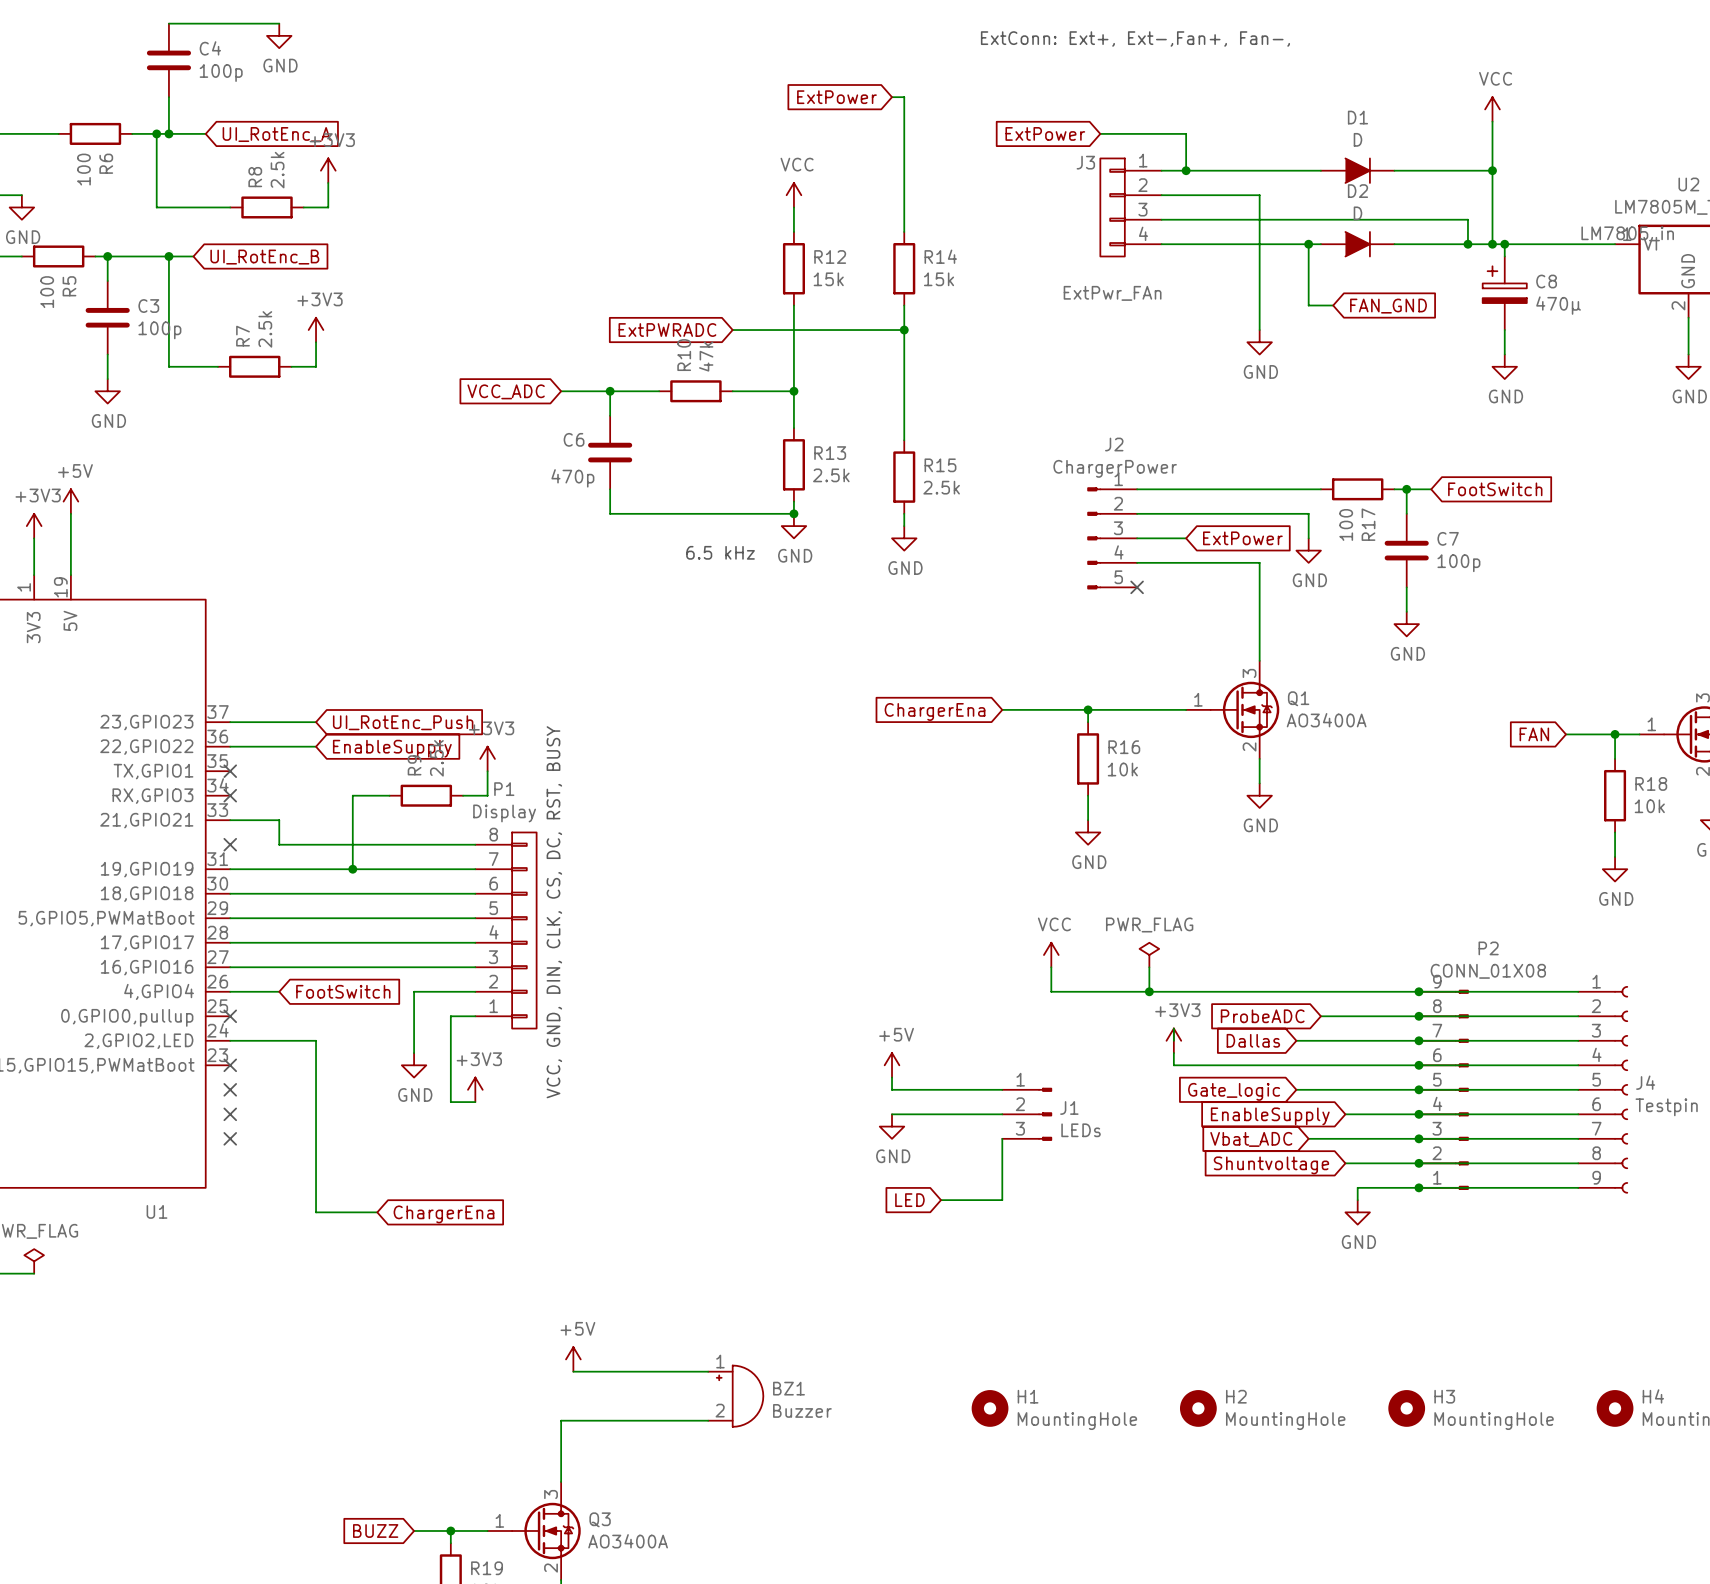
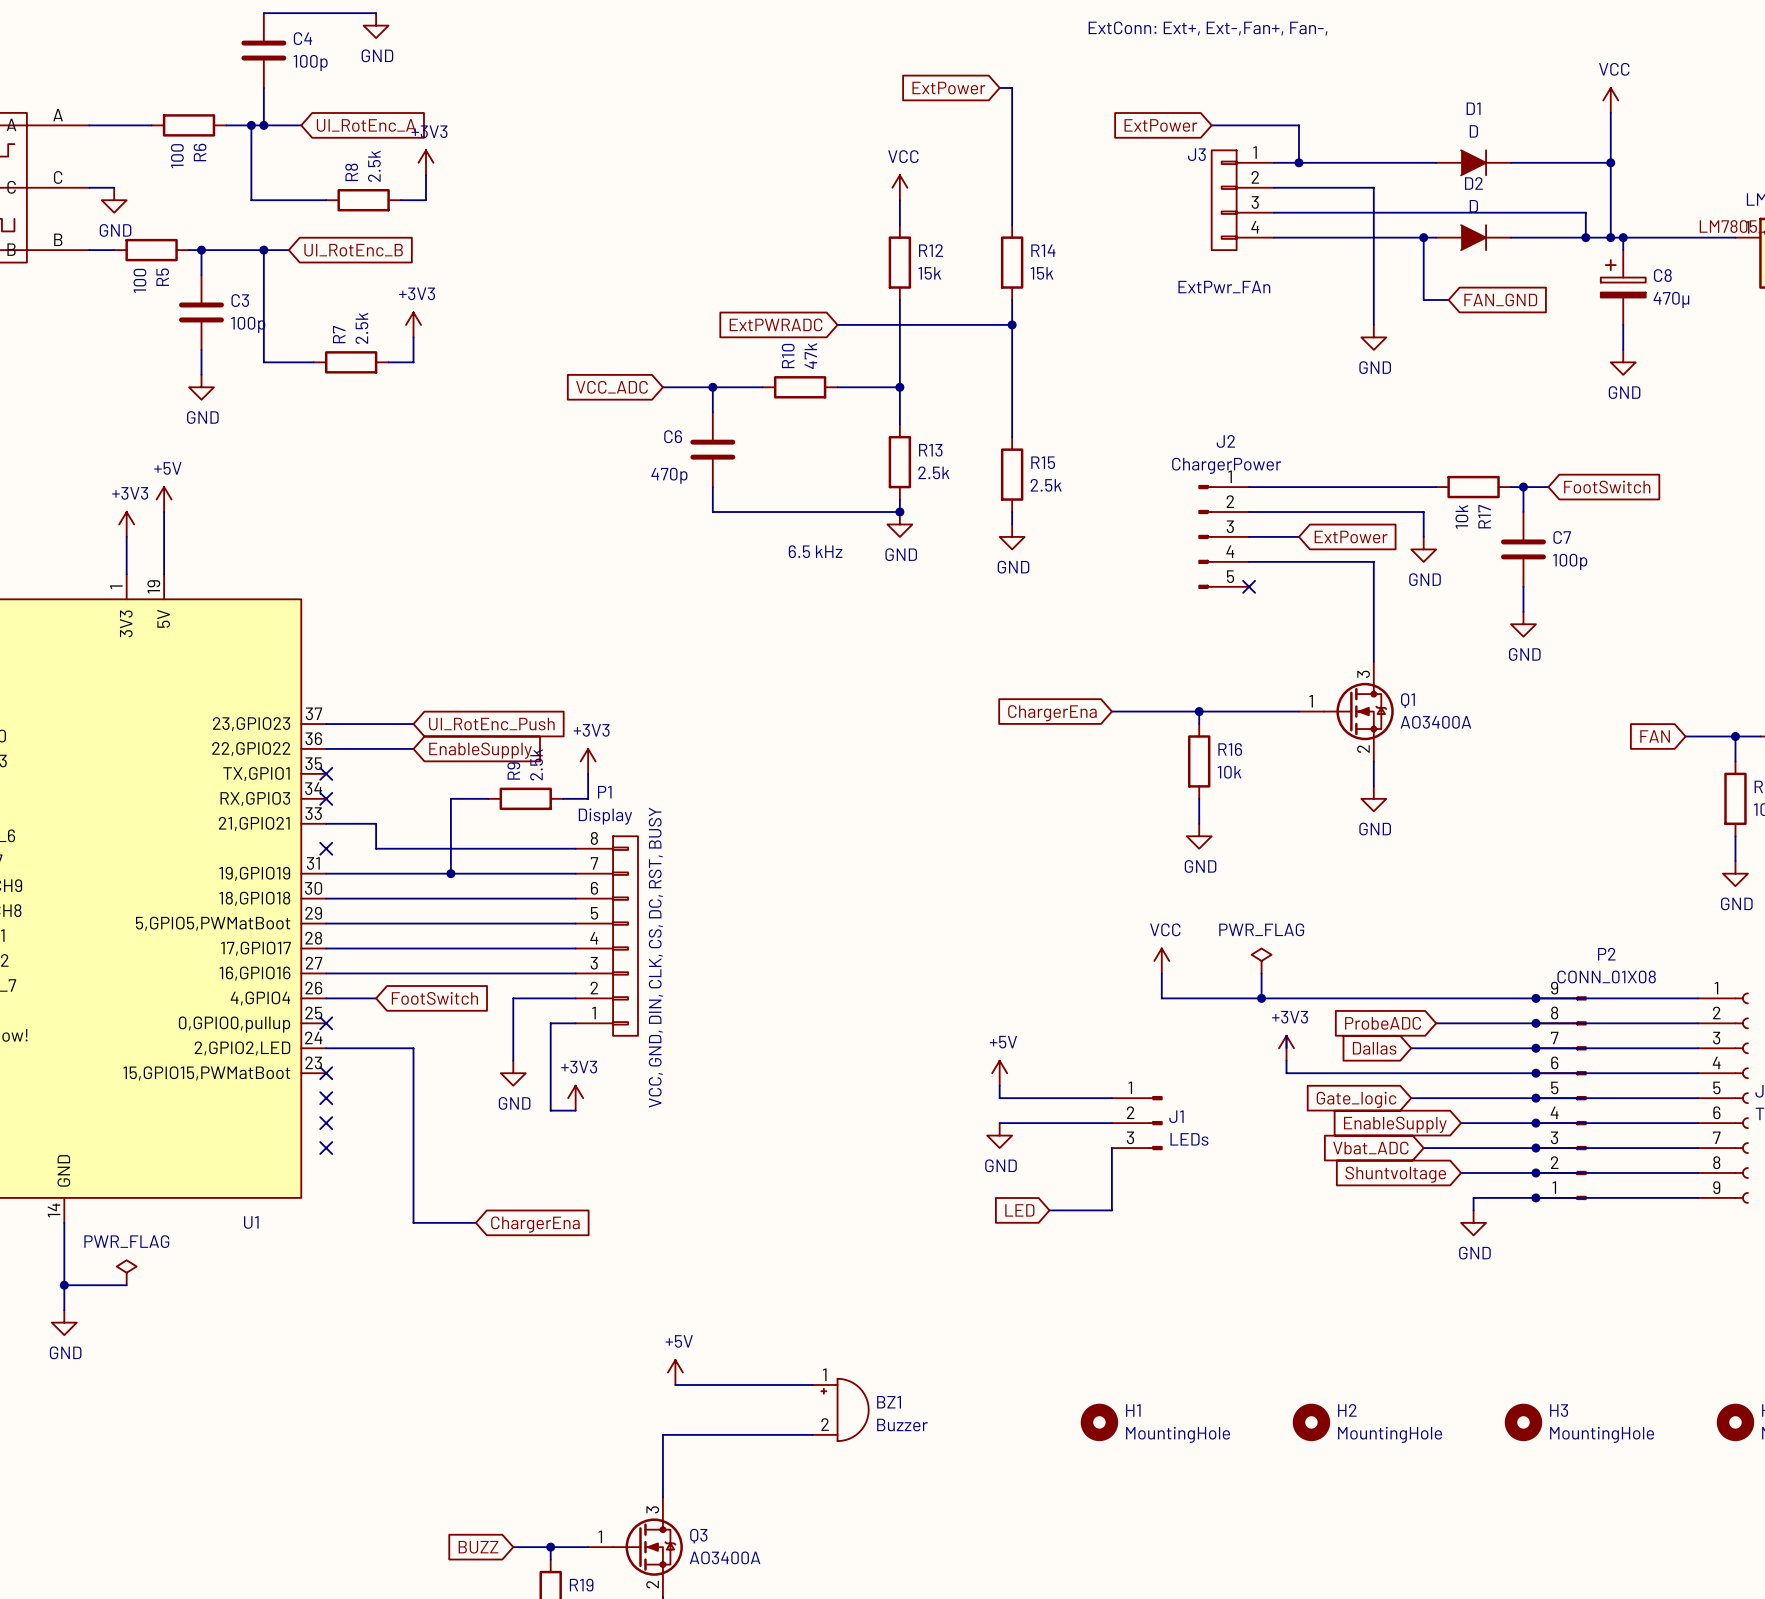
R17 value: 100 (1346, 524) -> 10k (1461, 516)

